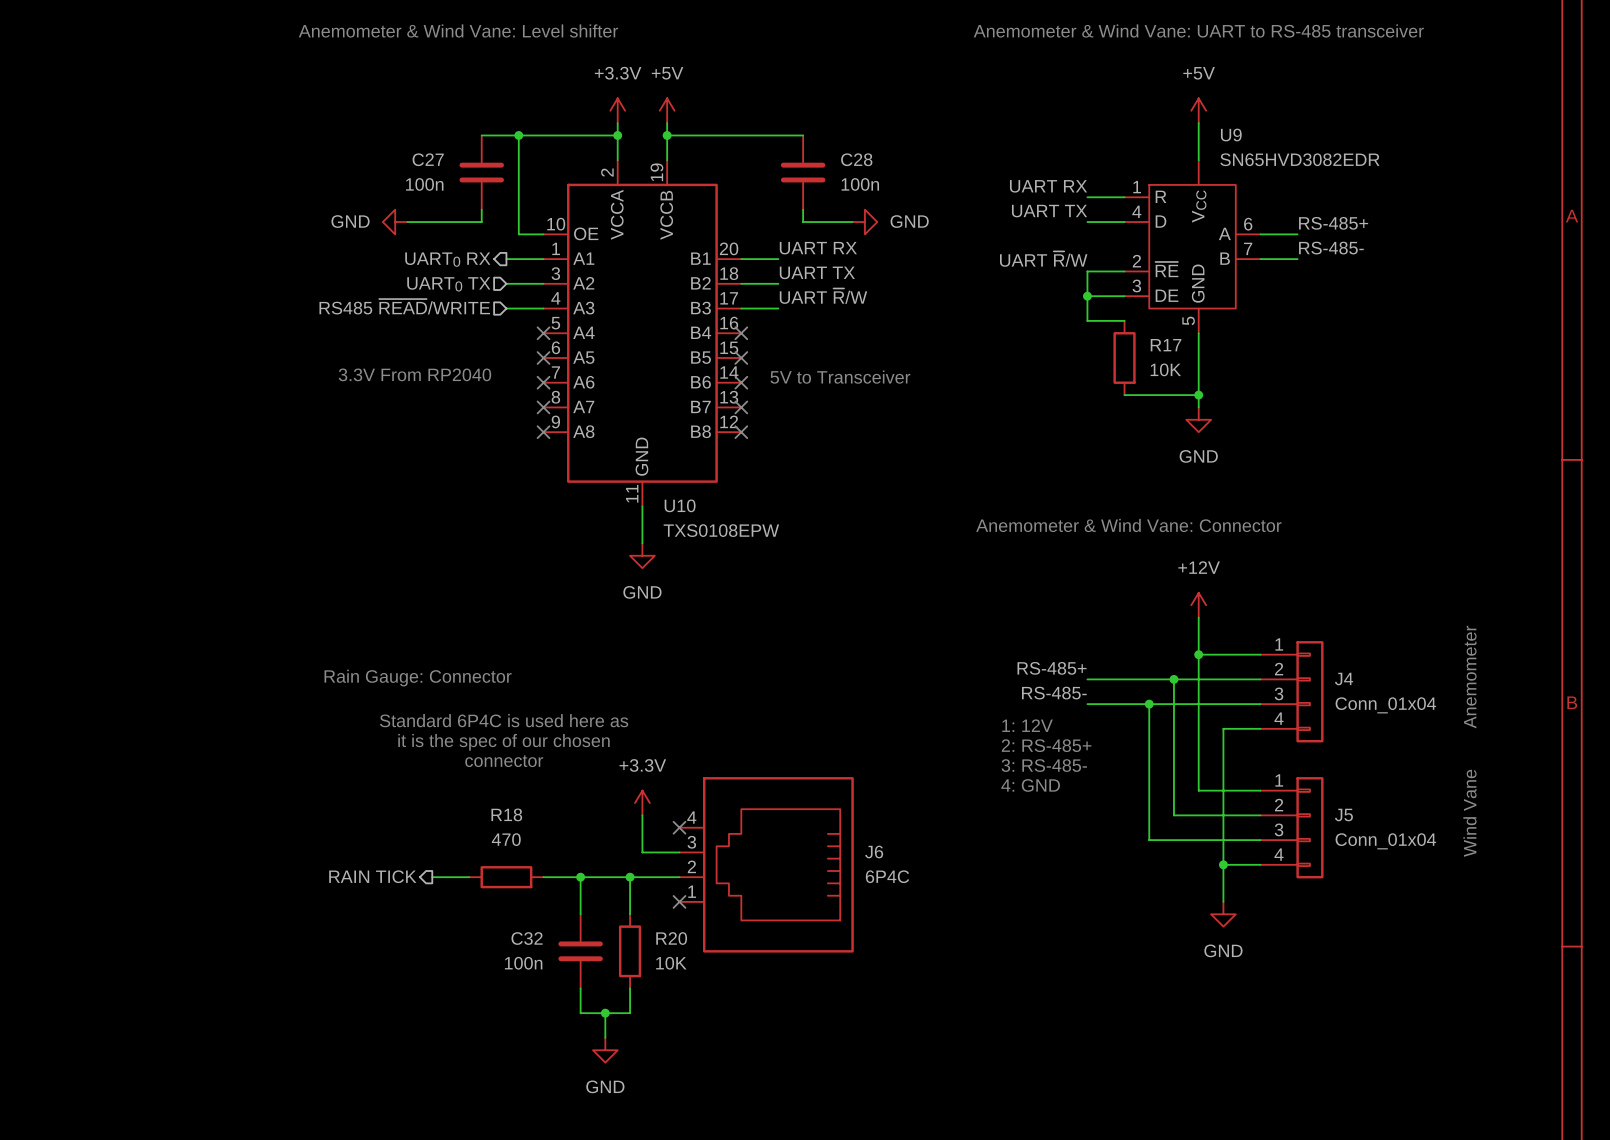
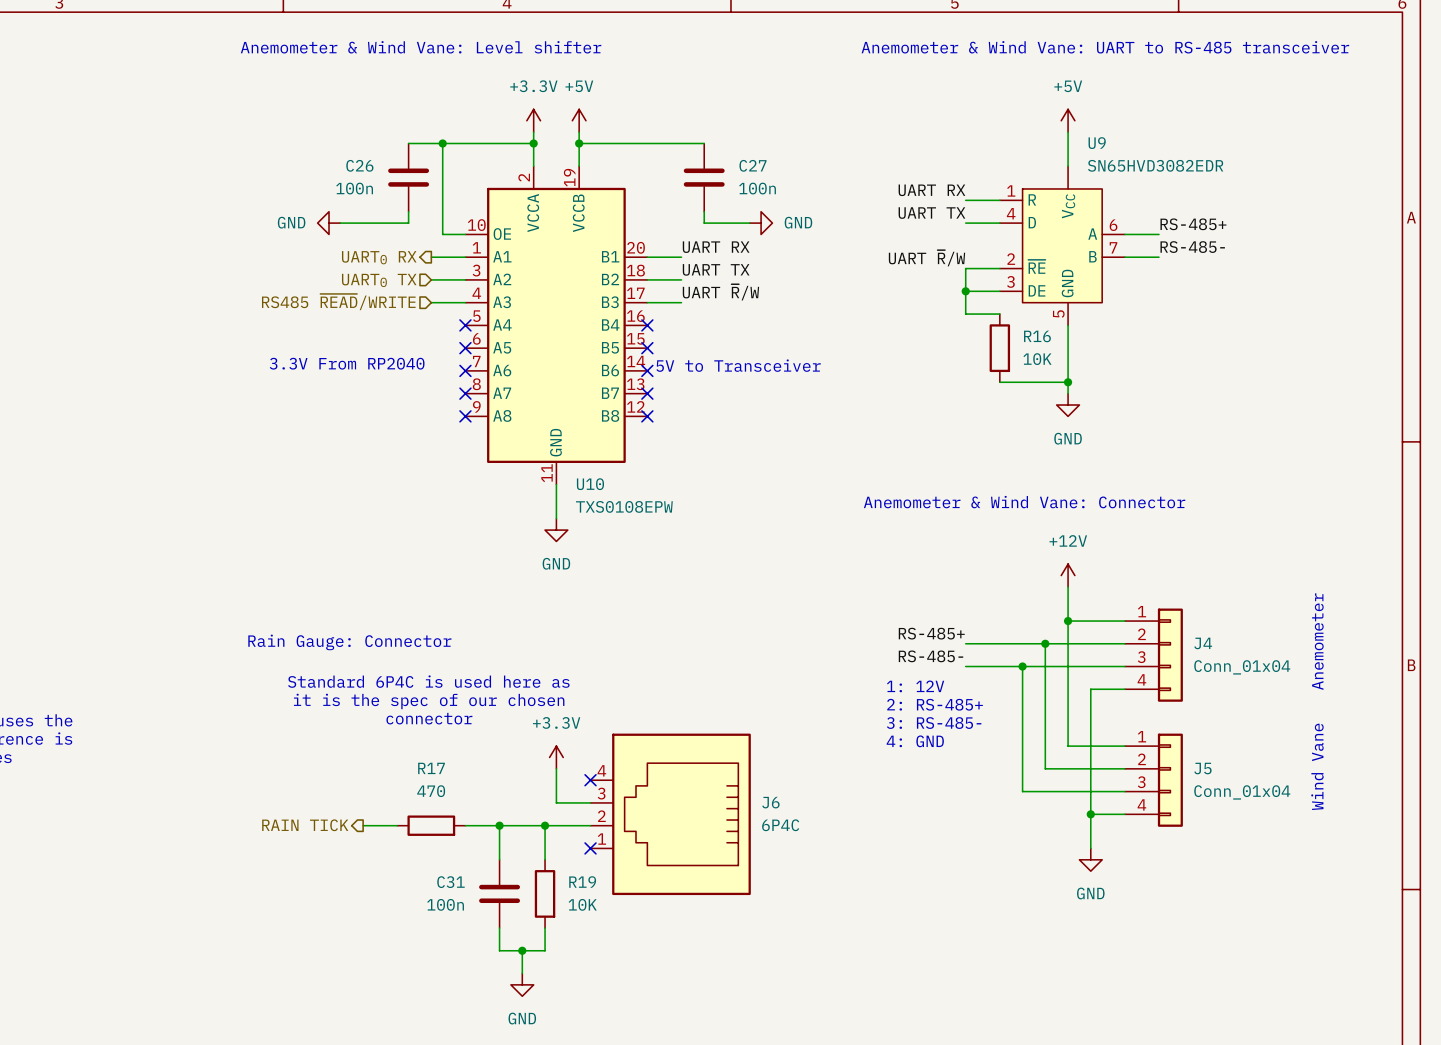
C27 name: C27 (428, 159) -> C26 (359, 165)
C28 name: C28 (856, 159) -> C27 (752, 165)
R17 name: R17 (1166, 345) -> R16 (1037, 336)
R18 name: R18 (506, 814) -> R17 (431, 768)
C32 name: C32 (527, 938) -> C31 (450, 882)
R20 name: R20 (671, 938) -> R19 (582, 882)

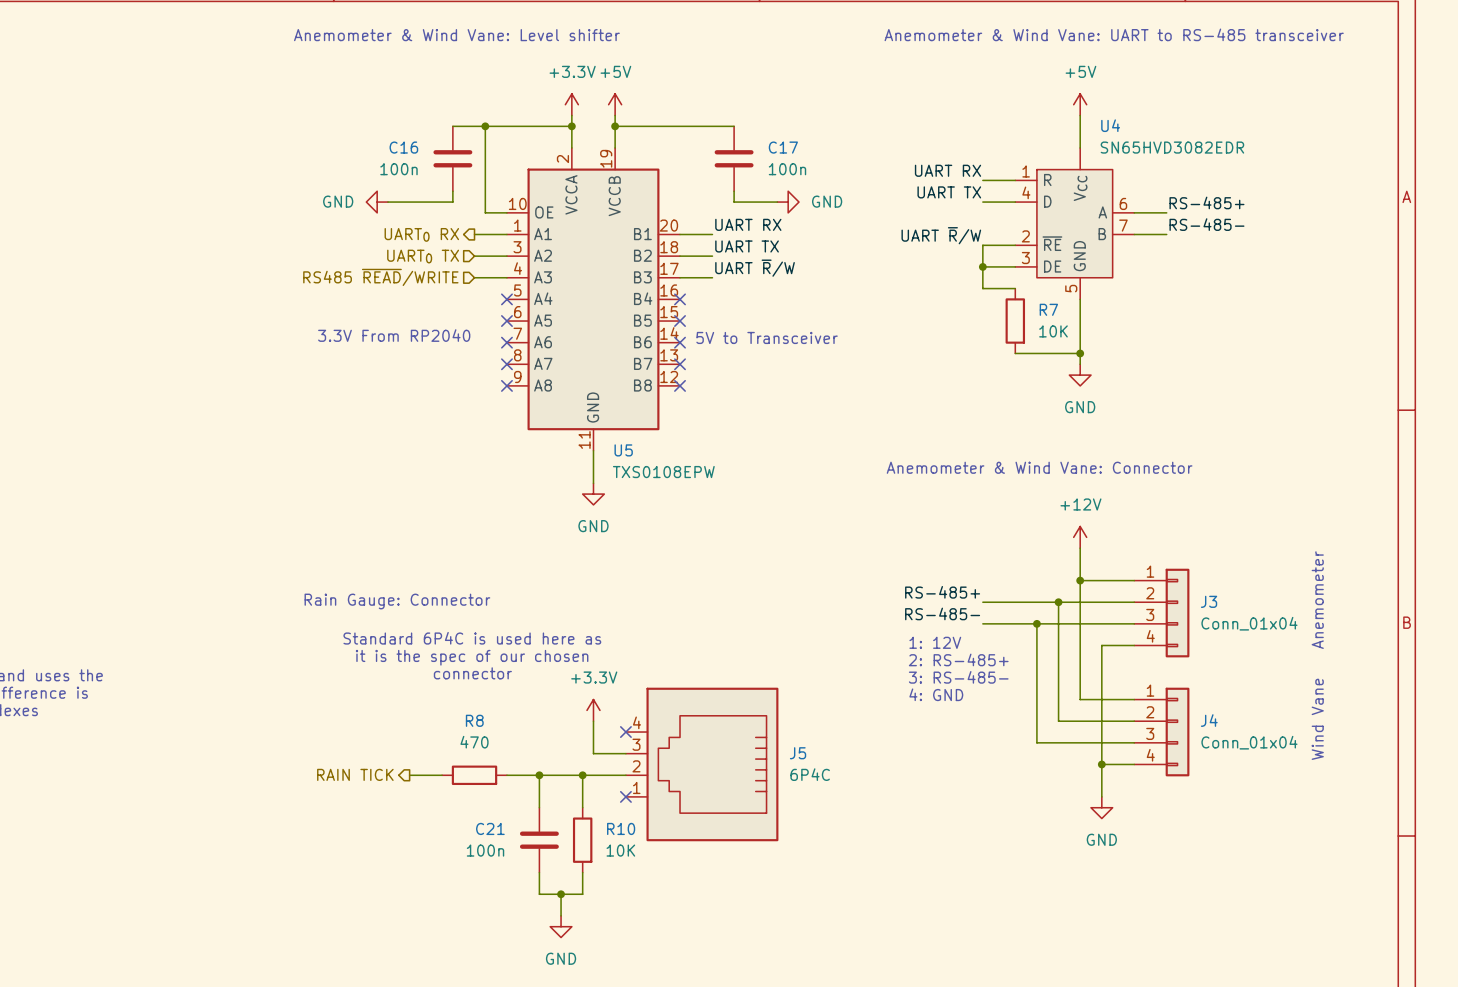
U9 name: U9 (1097, 143) -> U4 (1110, 125)
C26 name: C26 (359, 165) -> C16 (403, 147)
C27 name: C27 (752, 165) -> C17 (783, 147)
R16 name: R16 (1037, 336) -> R7 (1048, 309)
U10 name: U10 (590, 484) -> U5 (623, 450)
J4 name: J4 (1203, 643) -> J3 (1209, 601)
R17 name: R17 (431, 768) -> R8 (474, 720)
J5 name: J5 (1202, 768) -> J4 (1209, 720)
J6 name: J6 (770, 802) -> J5 (798, 753)
C31 name: C31 (450, 882) -> C21 (490, 828)
R19 name: R19 (582, 882) -> R10 (621, 828)

